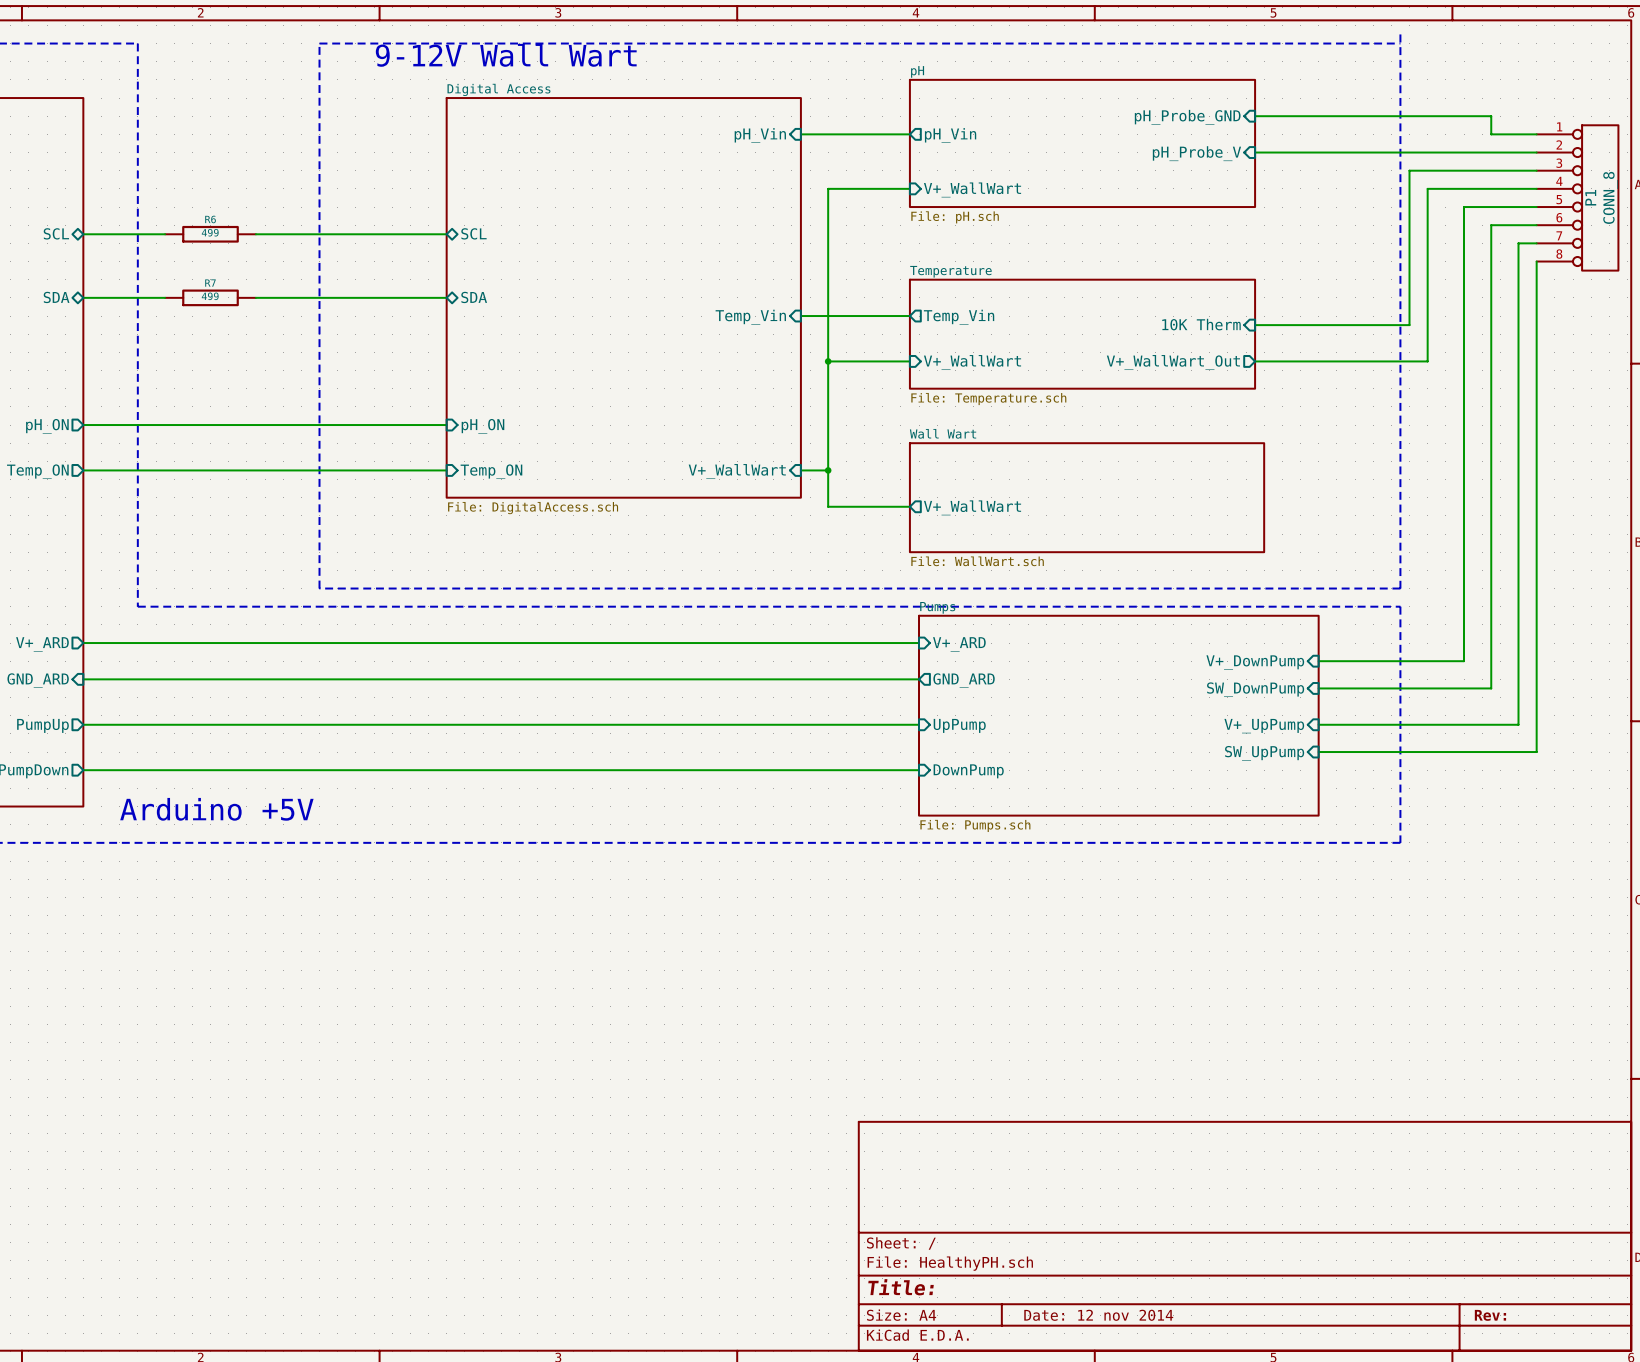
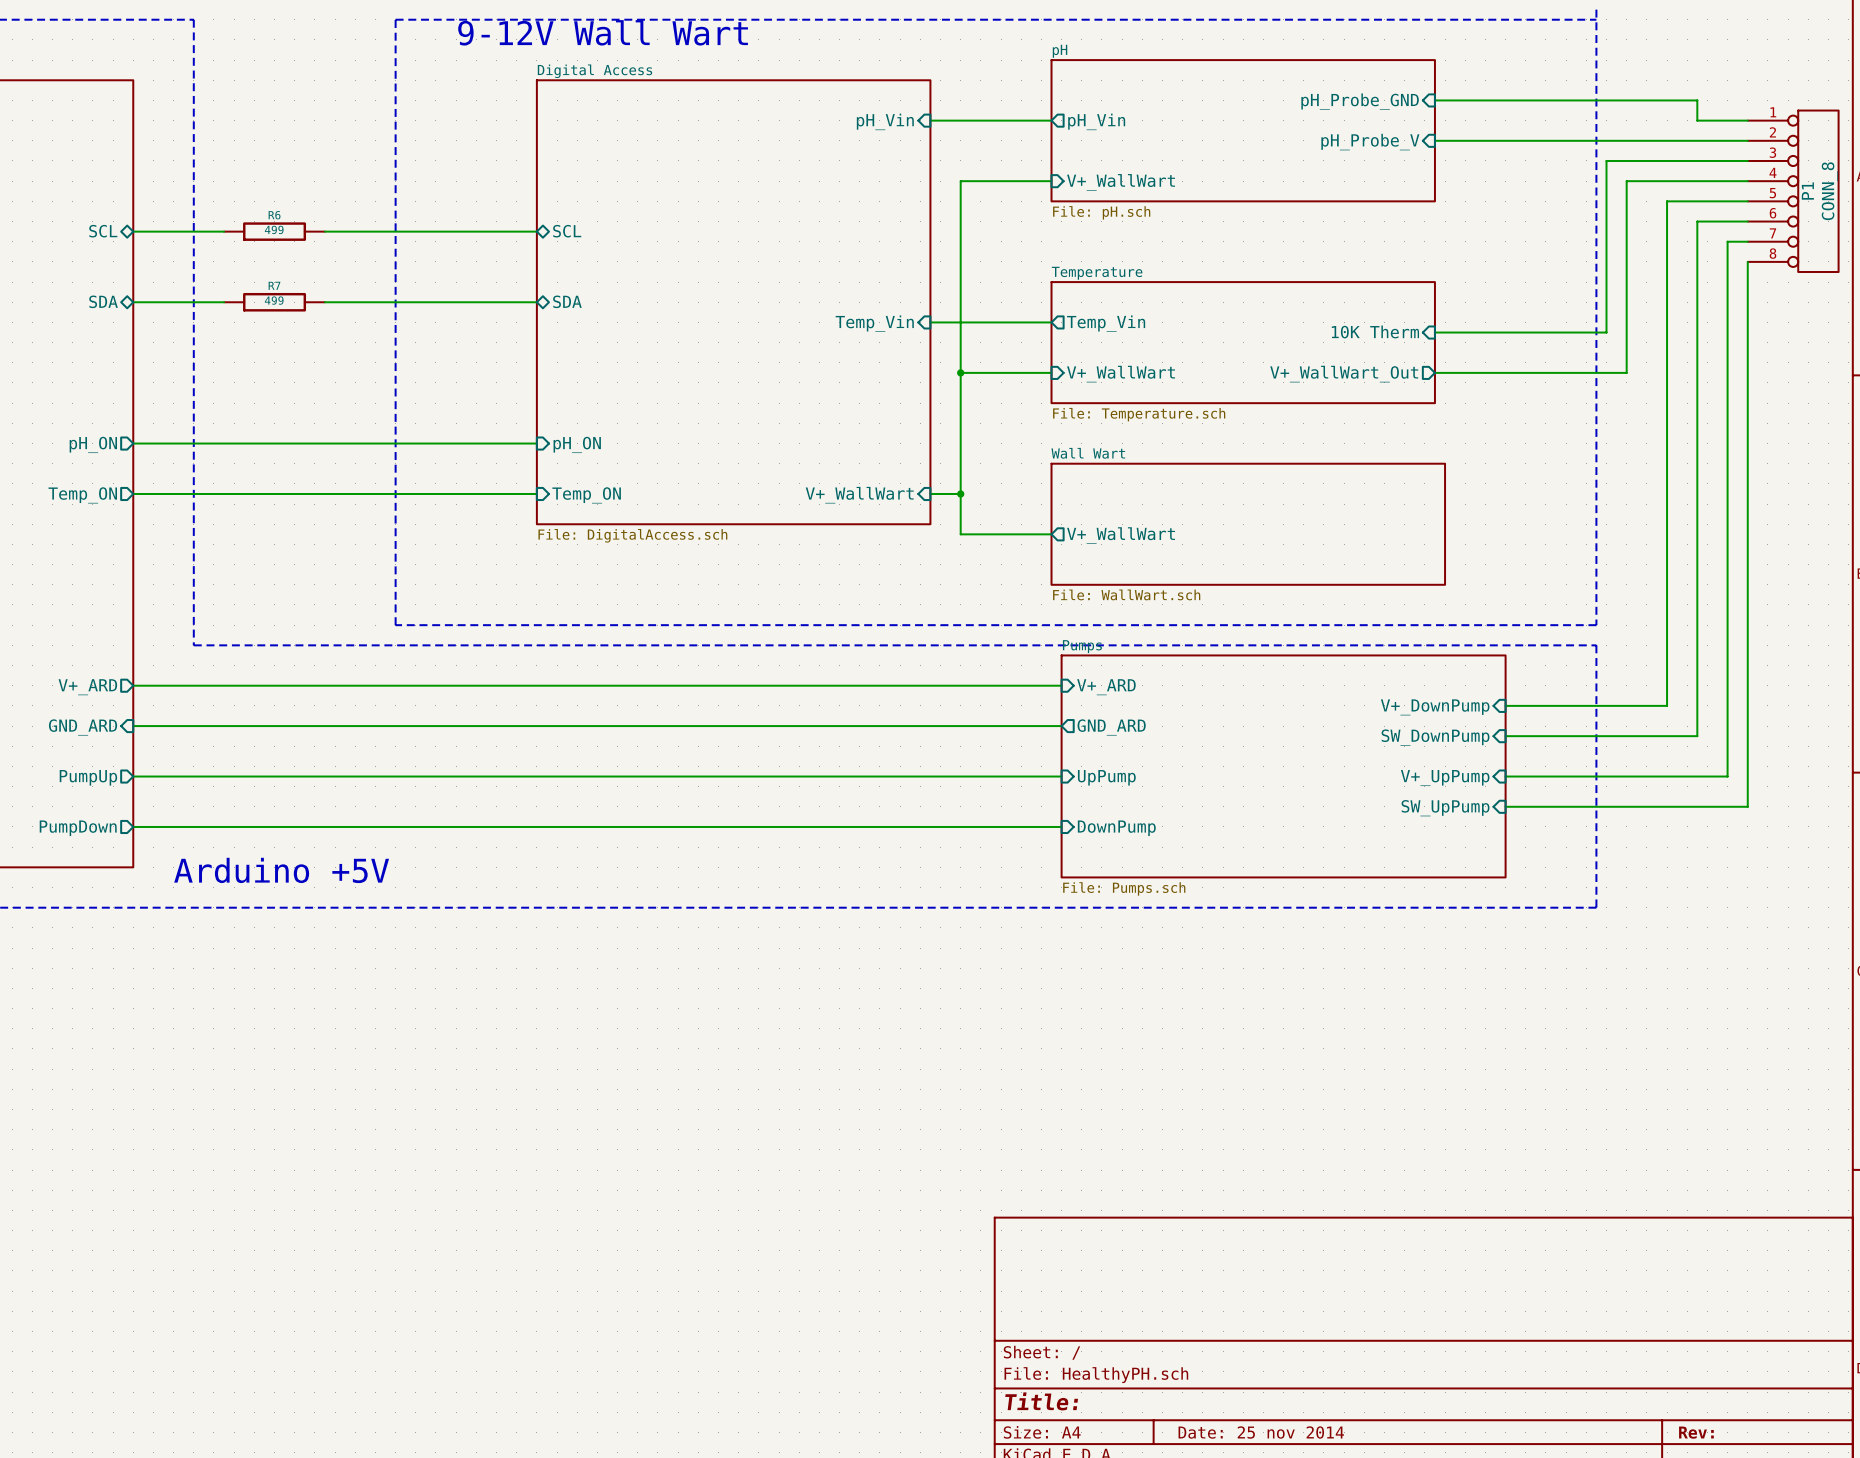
title block: Date: 12 nov 2014 (1098, 1315) -> Date: 25 nov 2014 (1261, 1432)

